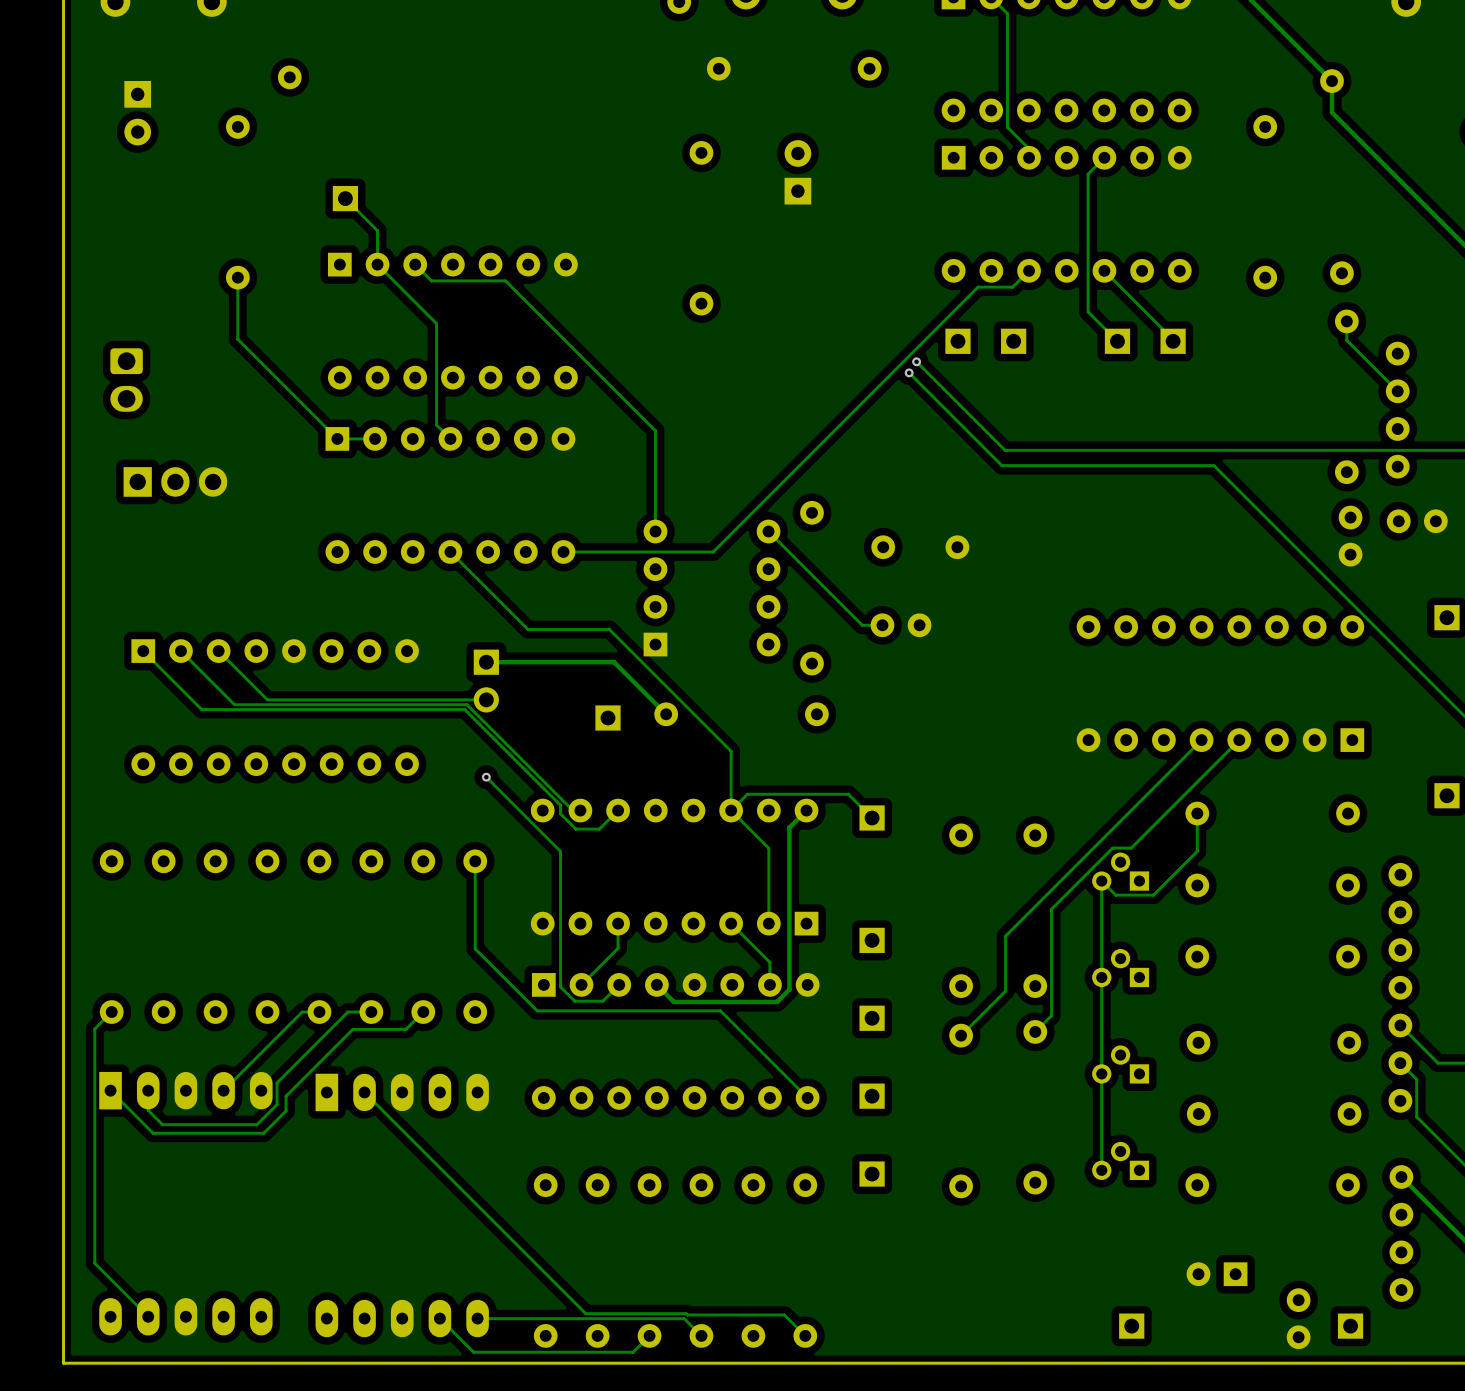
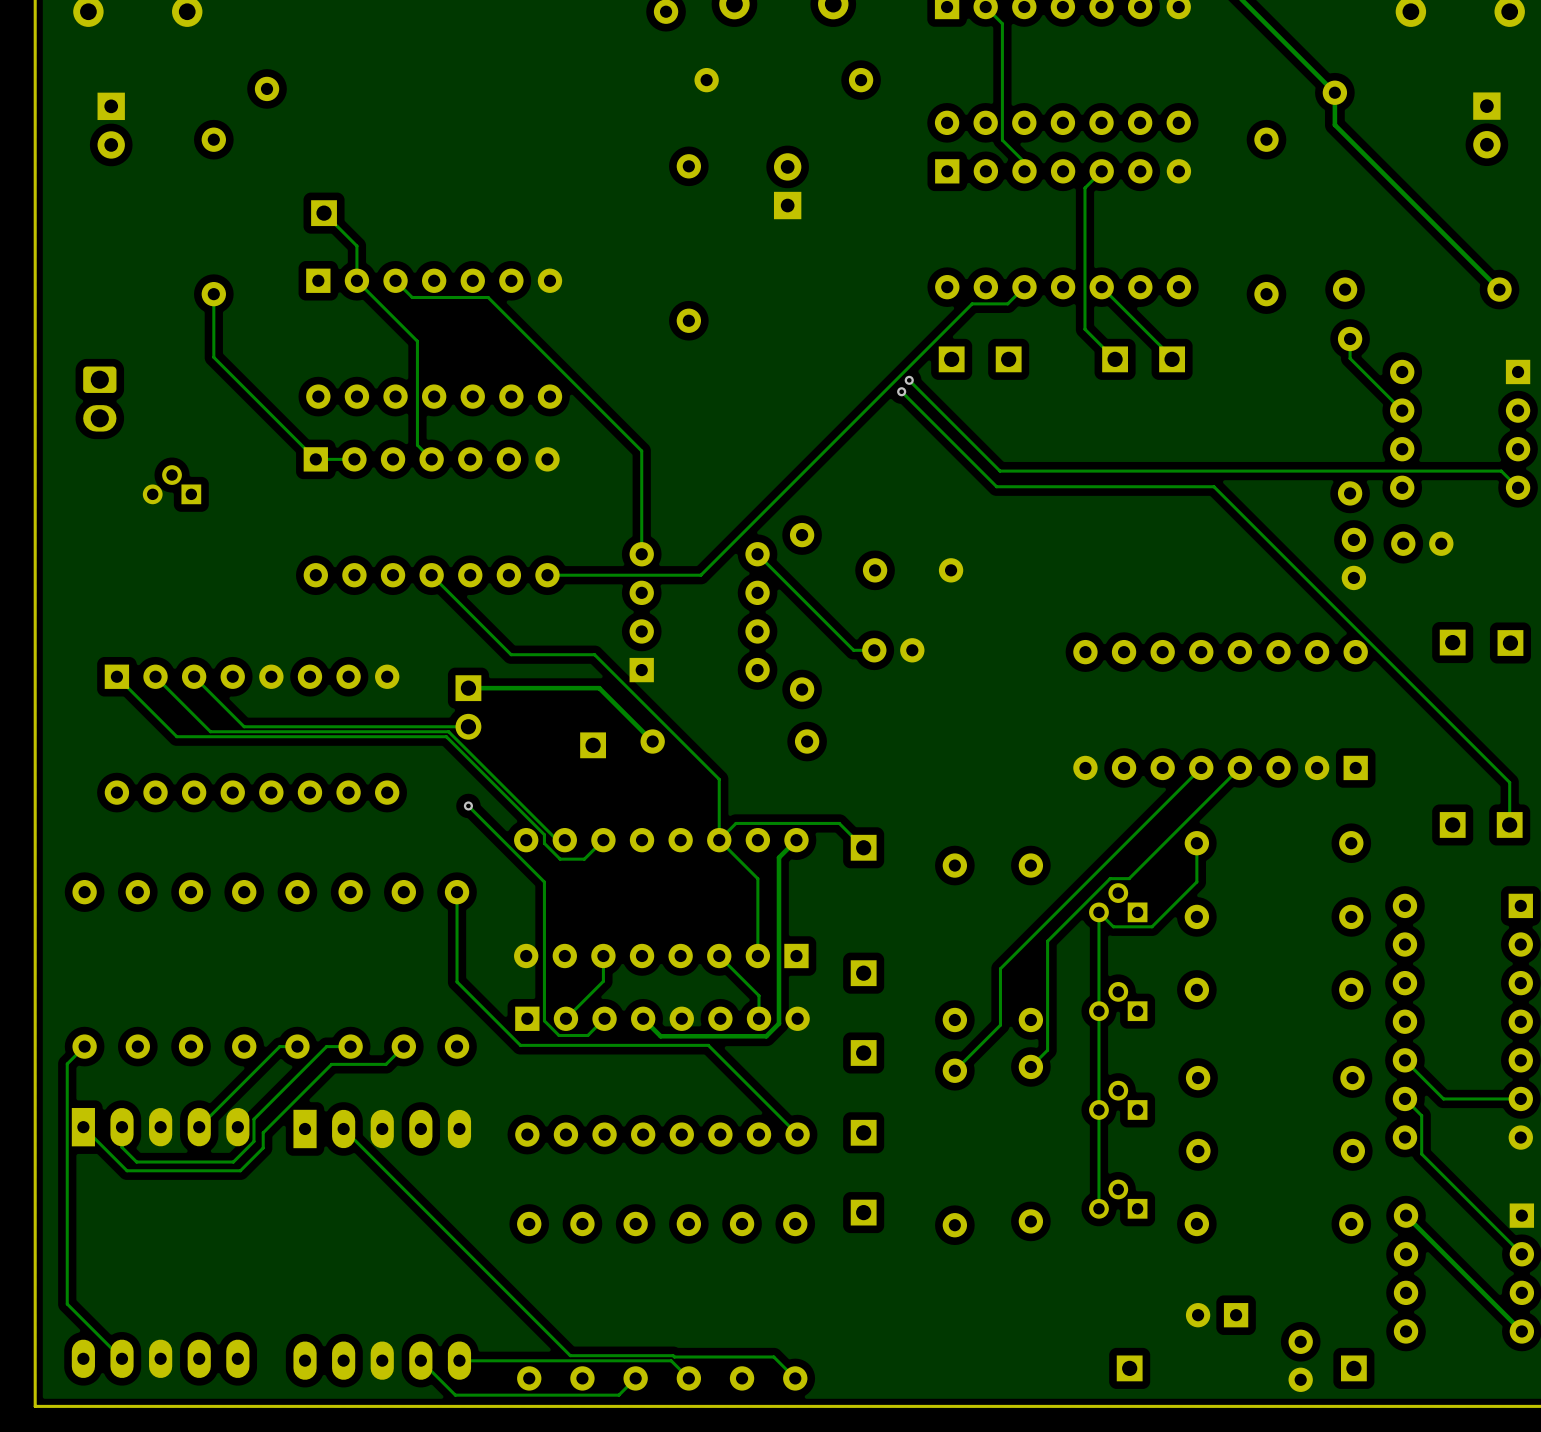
part: none -> (172, 484)
part: (175, 481) -> none

